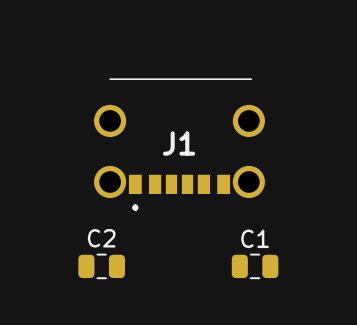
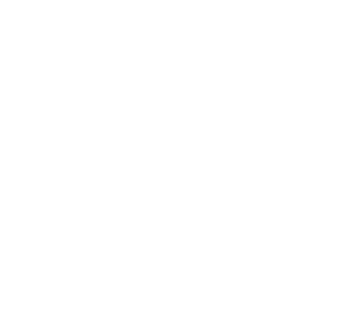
J1: (179, 144) -> none
C2: (101, 266) -> none
C1: (255, 266) -> none

